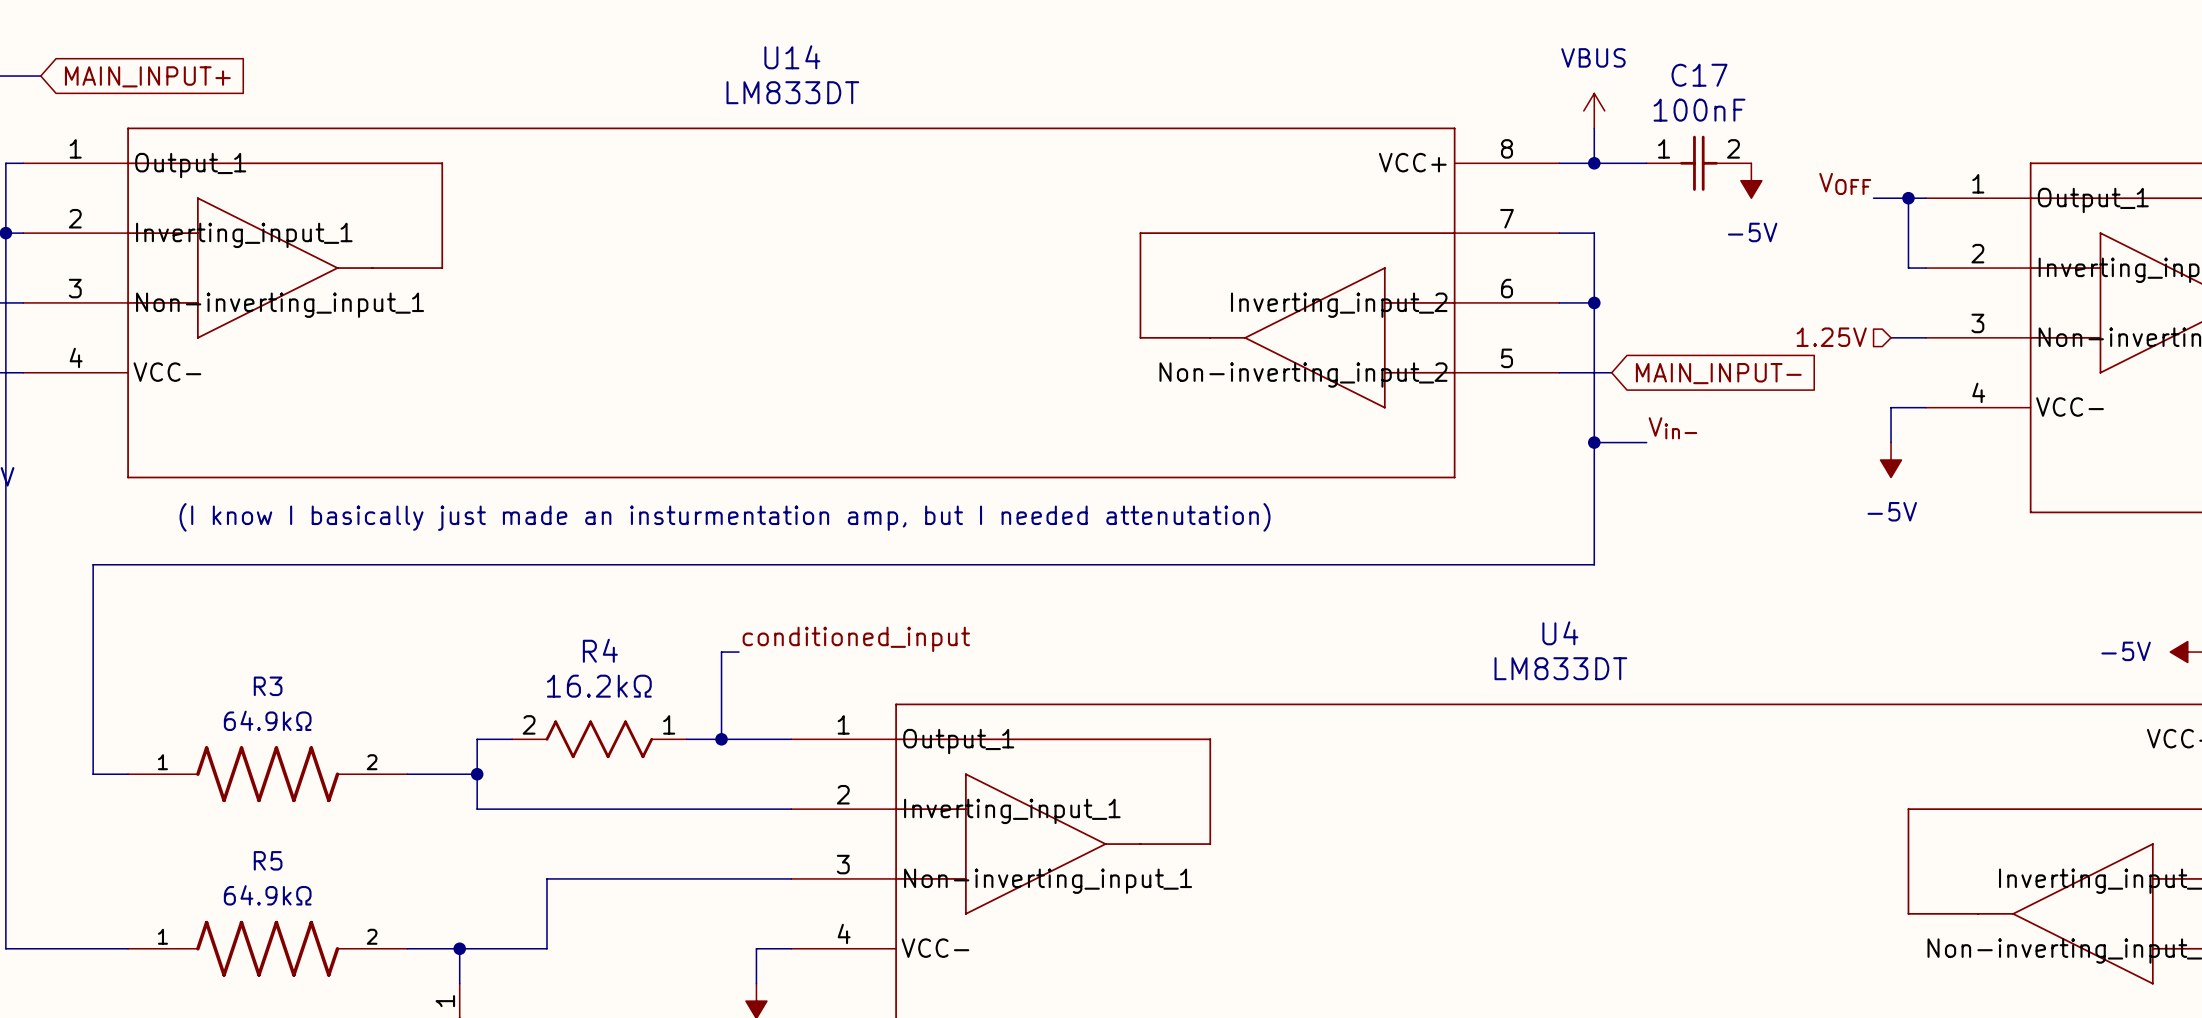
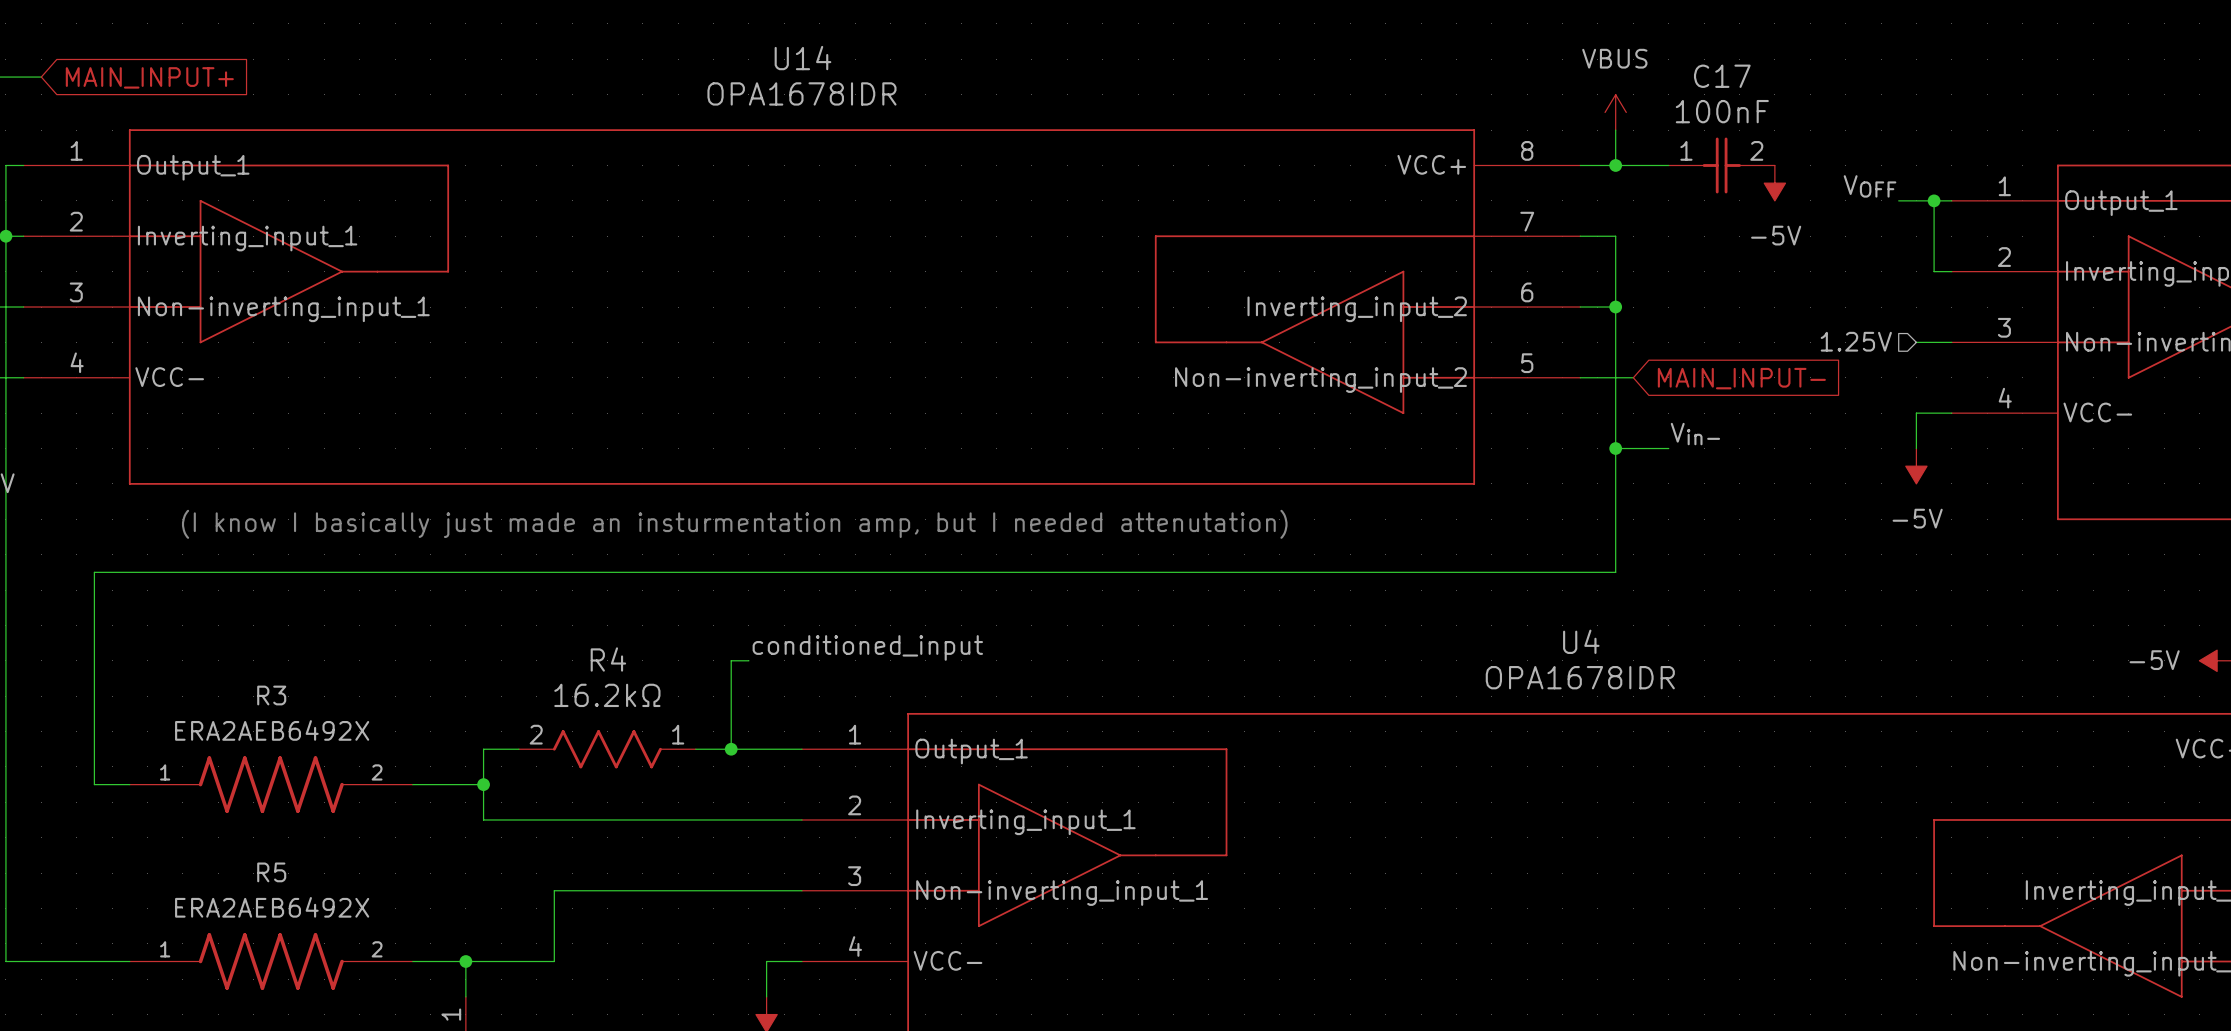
U14 value: LM833DT (792, 92) -> OPA1678IDR (801, 93)
U4 value: LM833DT (1560, 668) -> OPA1678IDR (1580, 677)
R3 value: 64.9kΩ (267, 720) -> ERA2AEB6492X (272, 730)
R5 value: 64.9kΩ (267, 895) -> ERA2AEB6492X (272, 907)

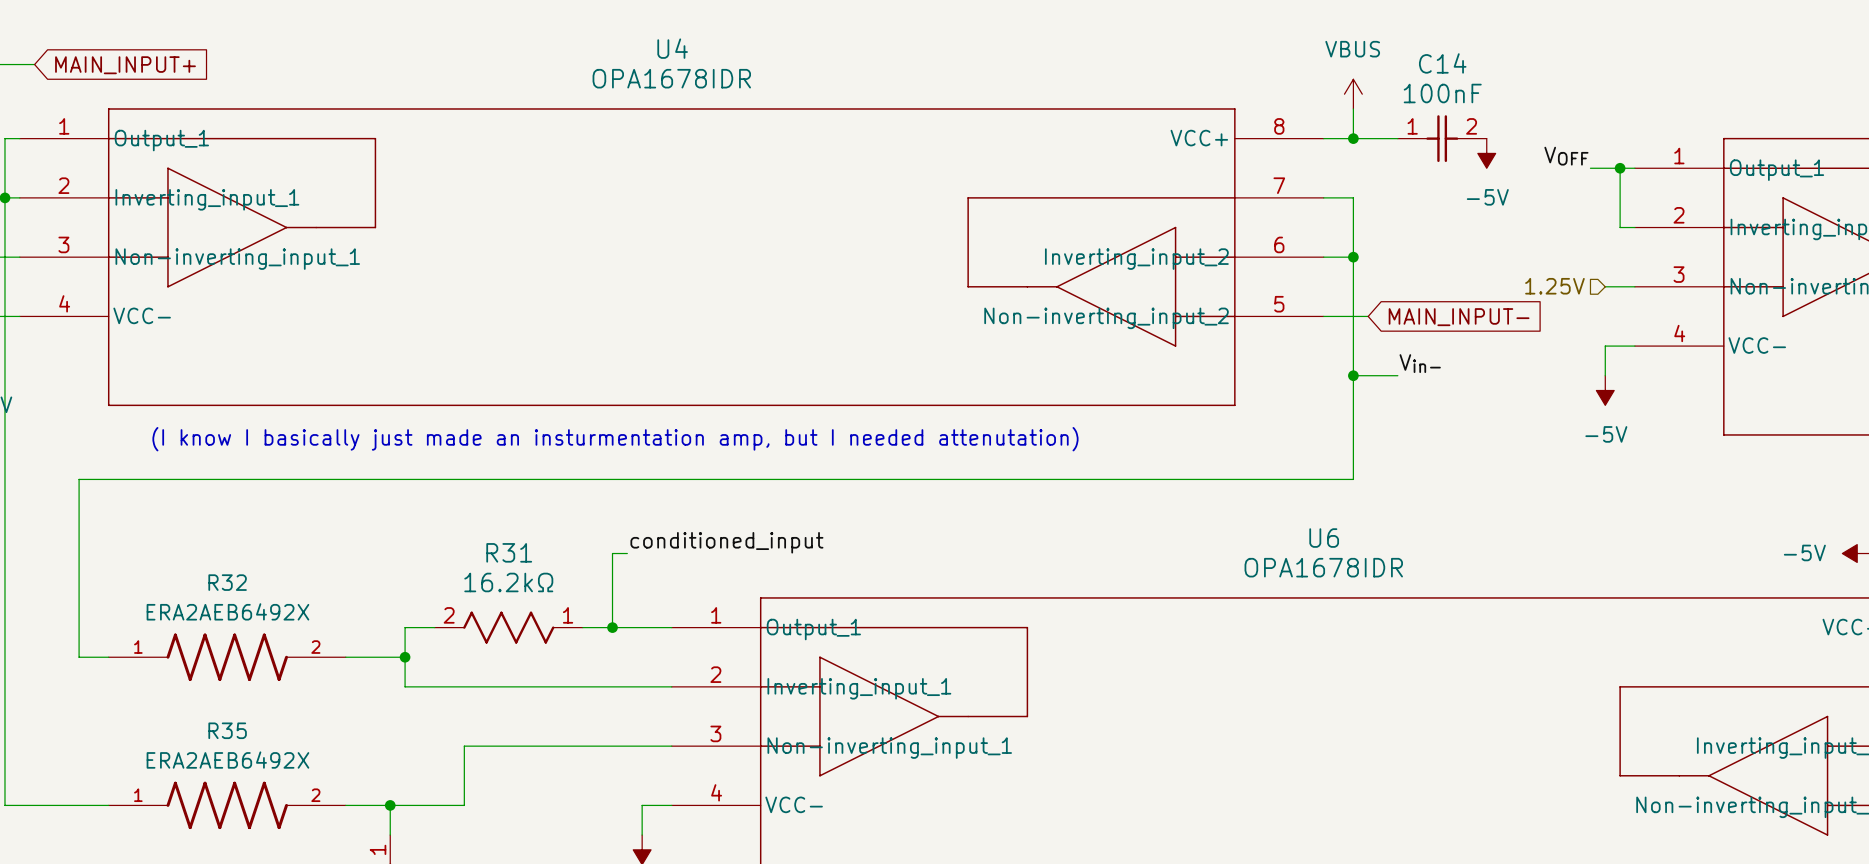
U14 name: U14 (802, 58) -> U4 (672, 48)
C17 name: C17 (1722, 76) -> C14 (1442, 63)
U4 name: U4 (1581, 641) -> U6 (1324, 538)
R4 name: R4 (608, 659) -> R31 (509, 552)
R3 name: R3 (271, 695) -> R32 (227, 582)
R5 name: R5 (271, 872) -> R35 (227, 730)

